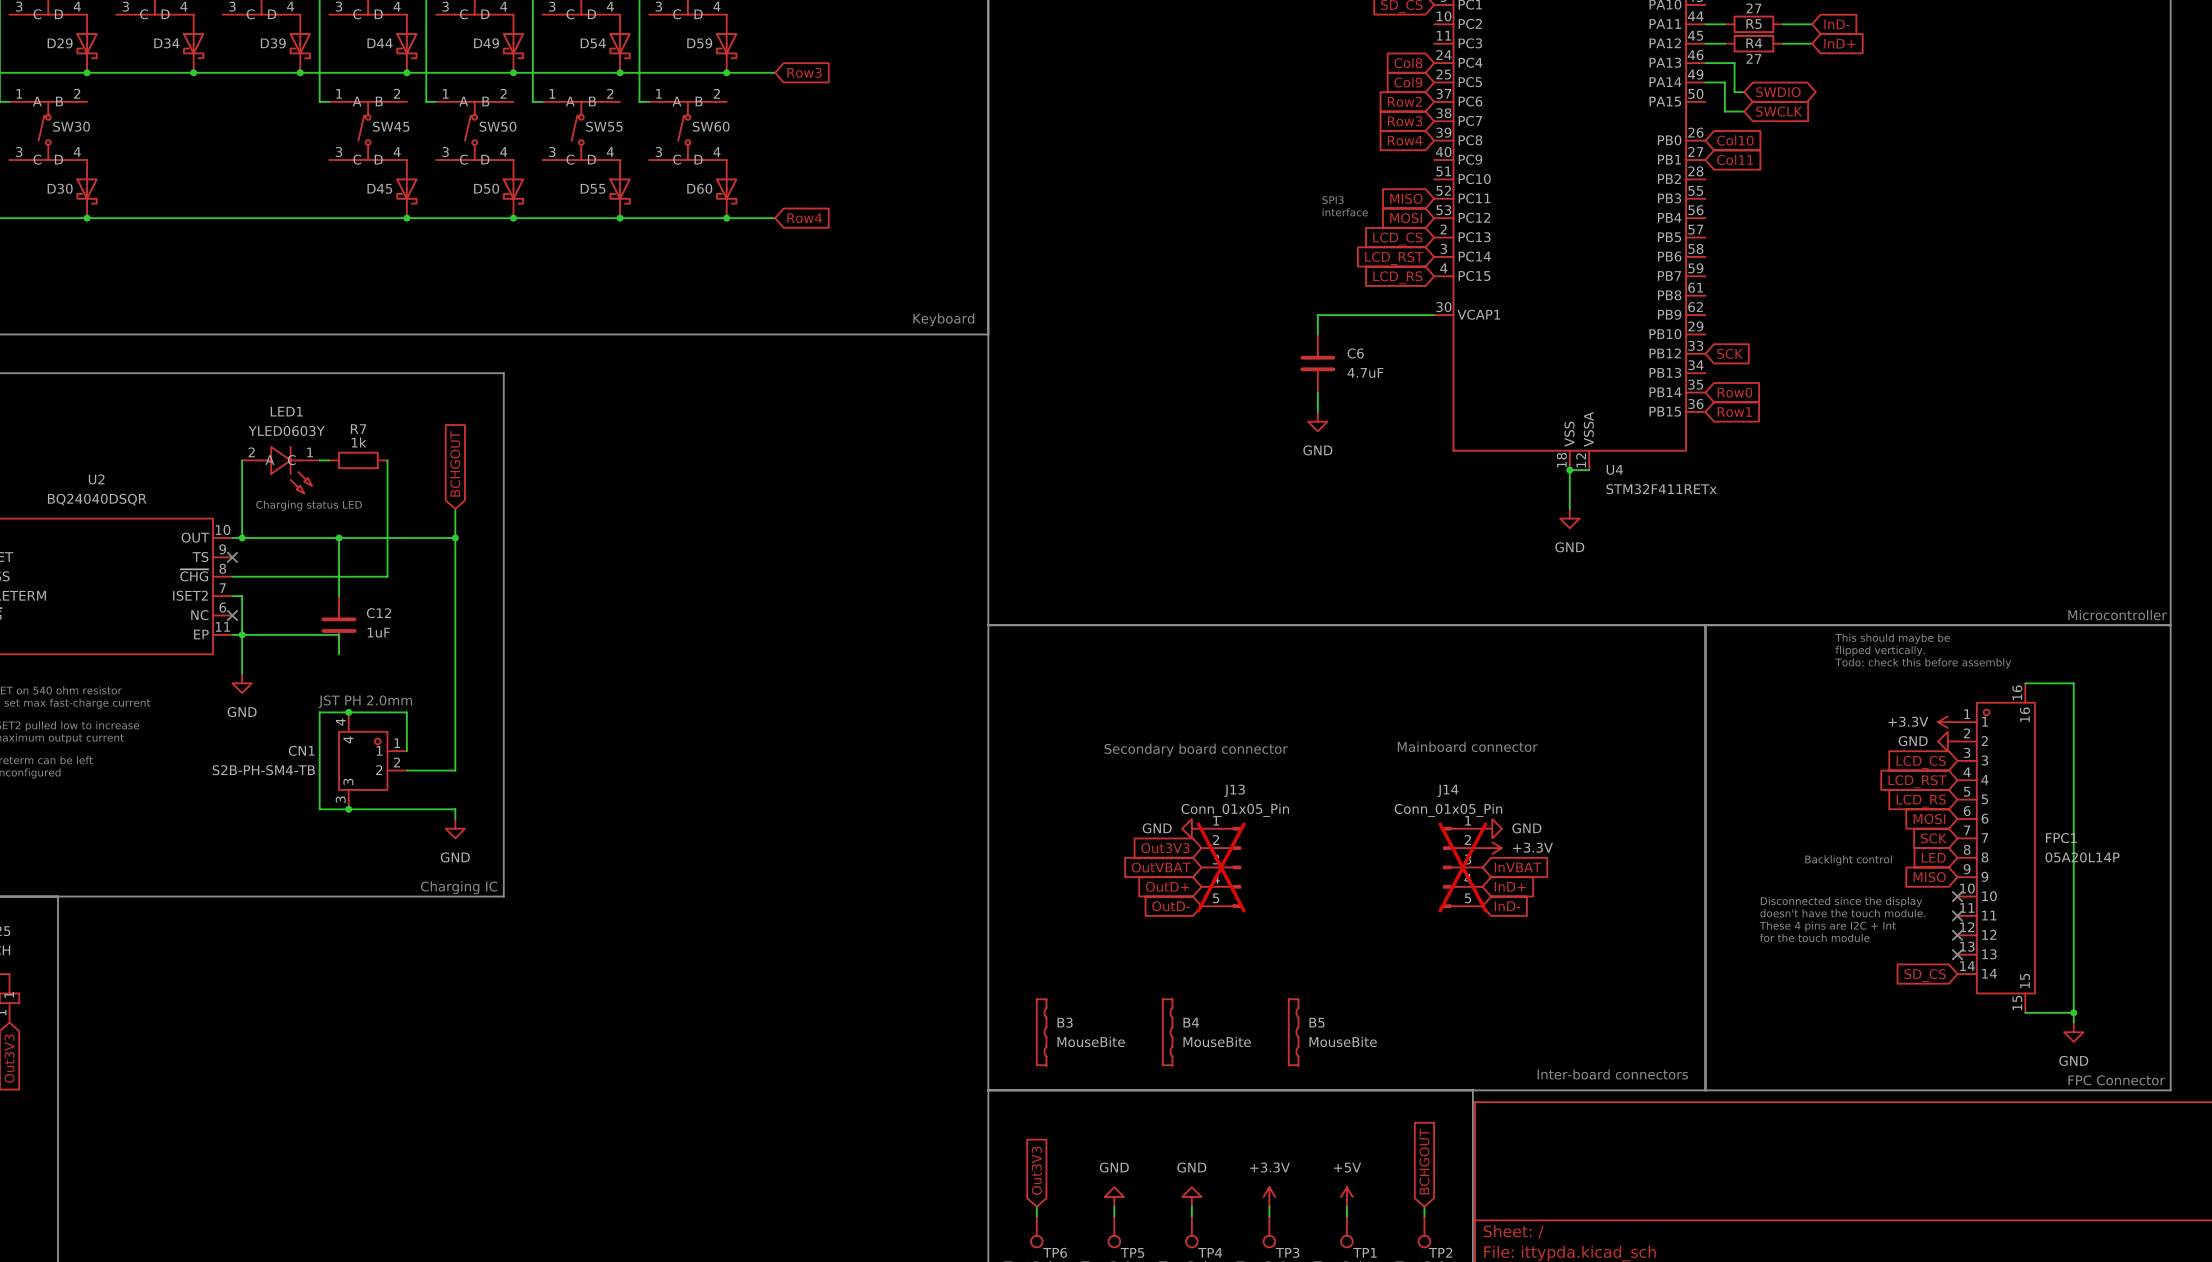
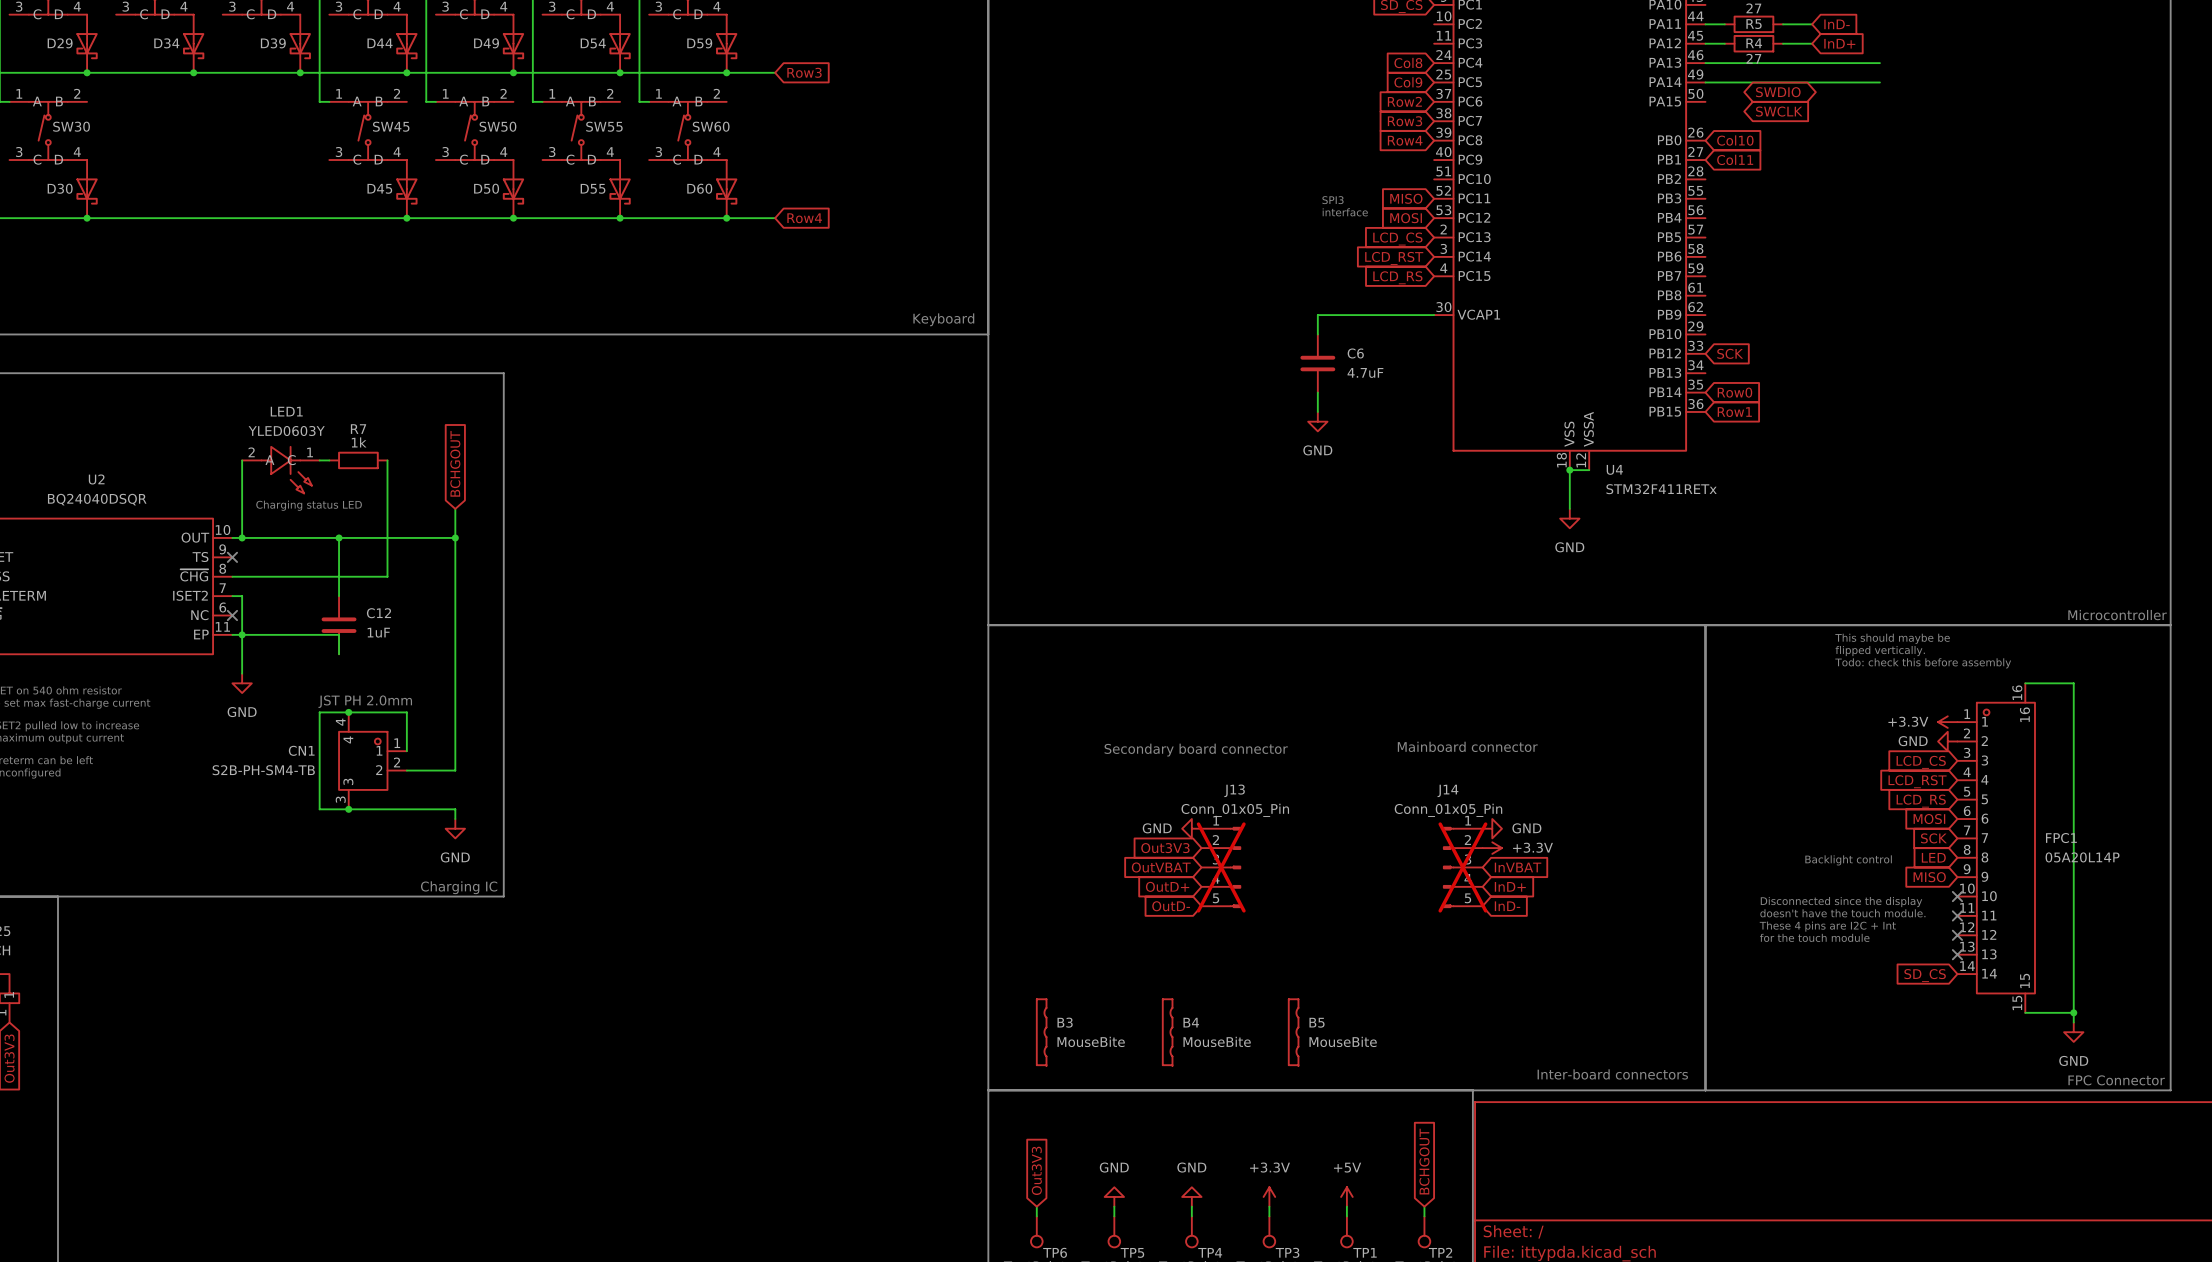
wire: (1734, 63) (1734, 92) (1744, 92) -> (1734, 63) (1879, 63)
wire: (1724, 82) (1724, 111) (1744, 111) -> (1724, 82) (1879, 82)

